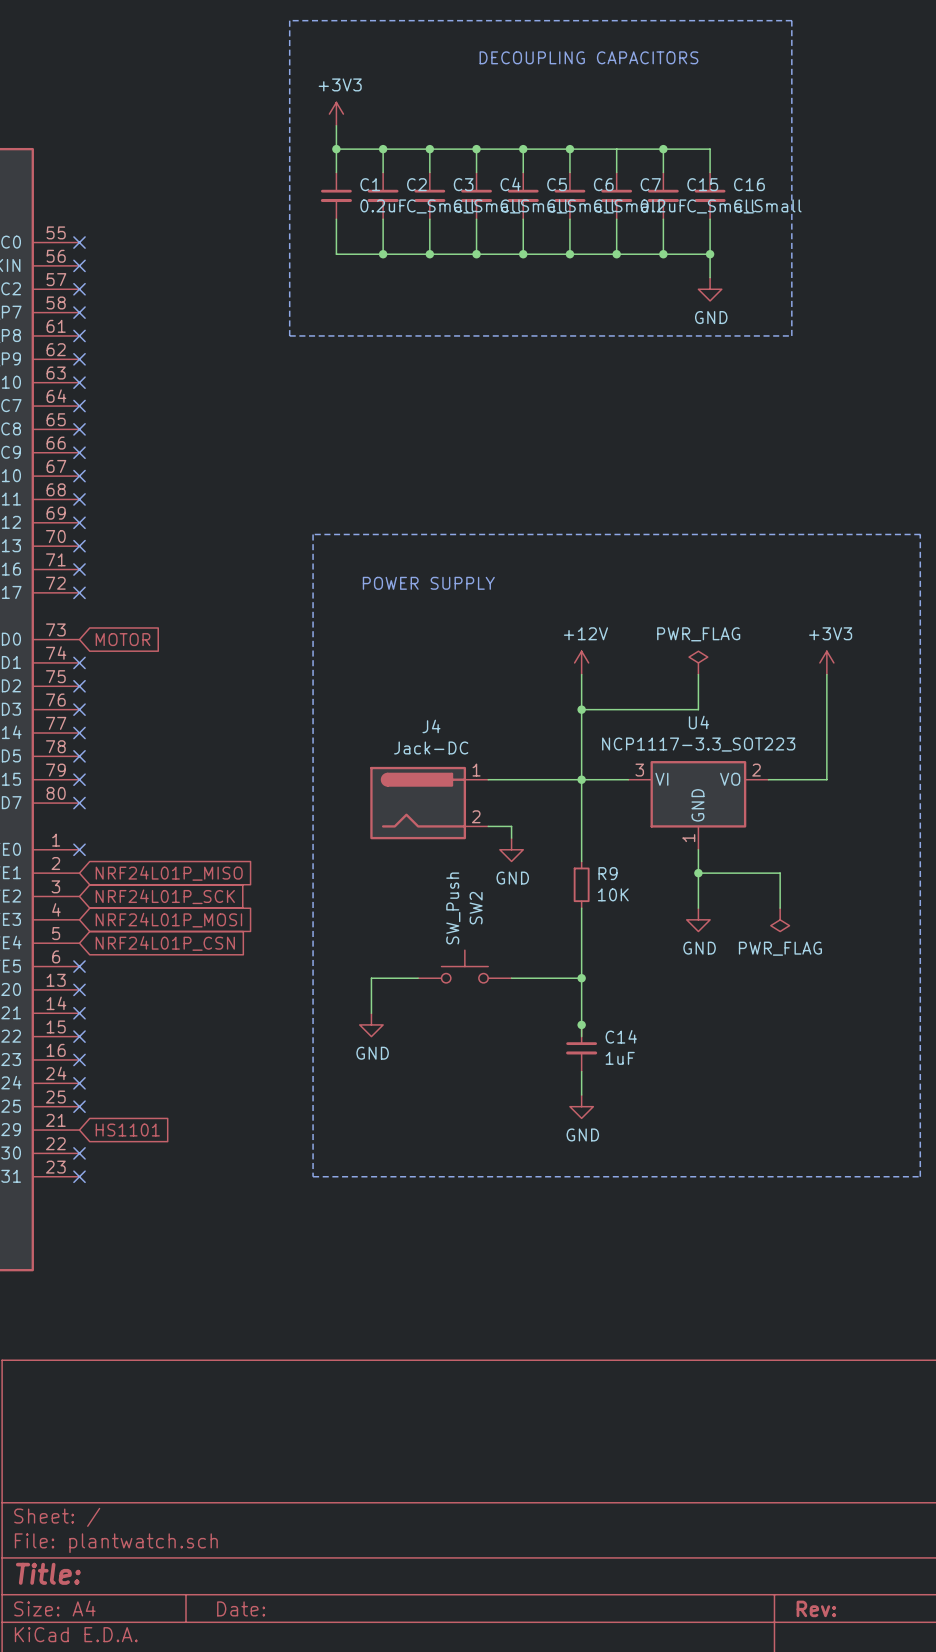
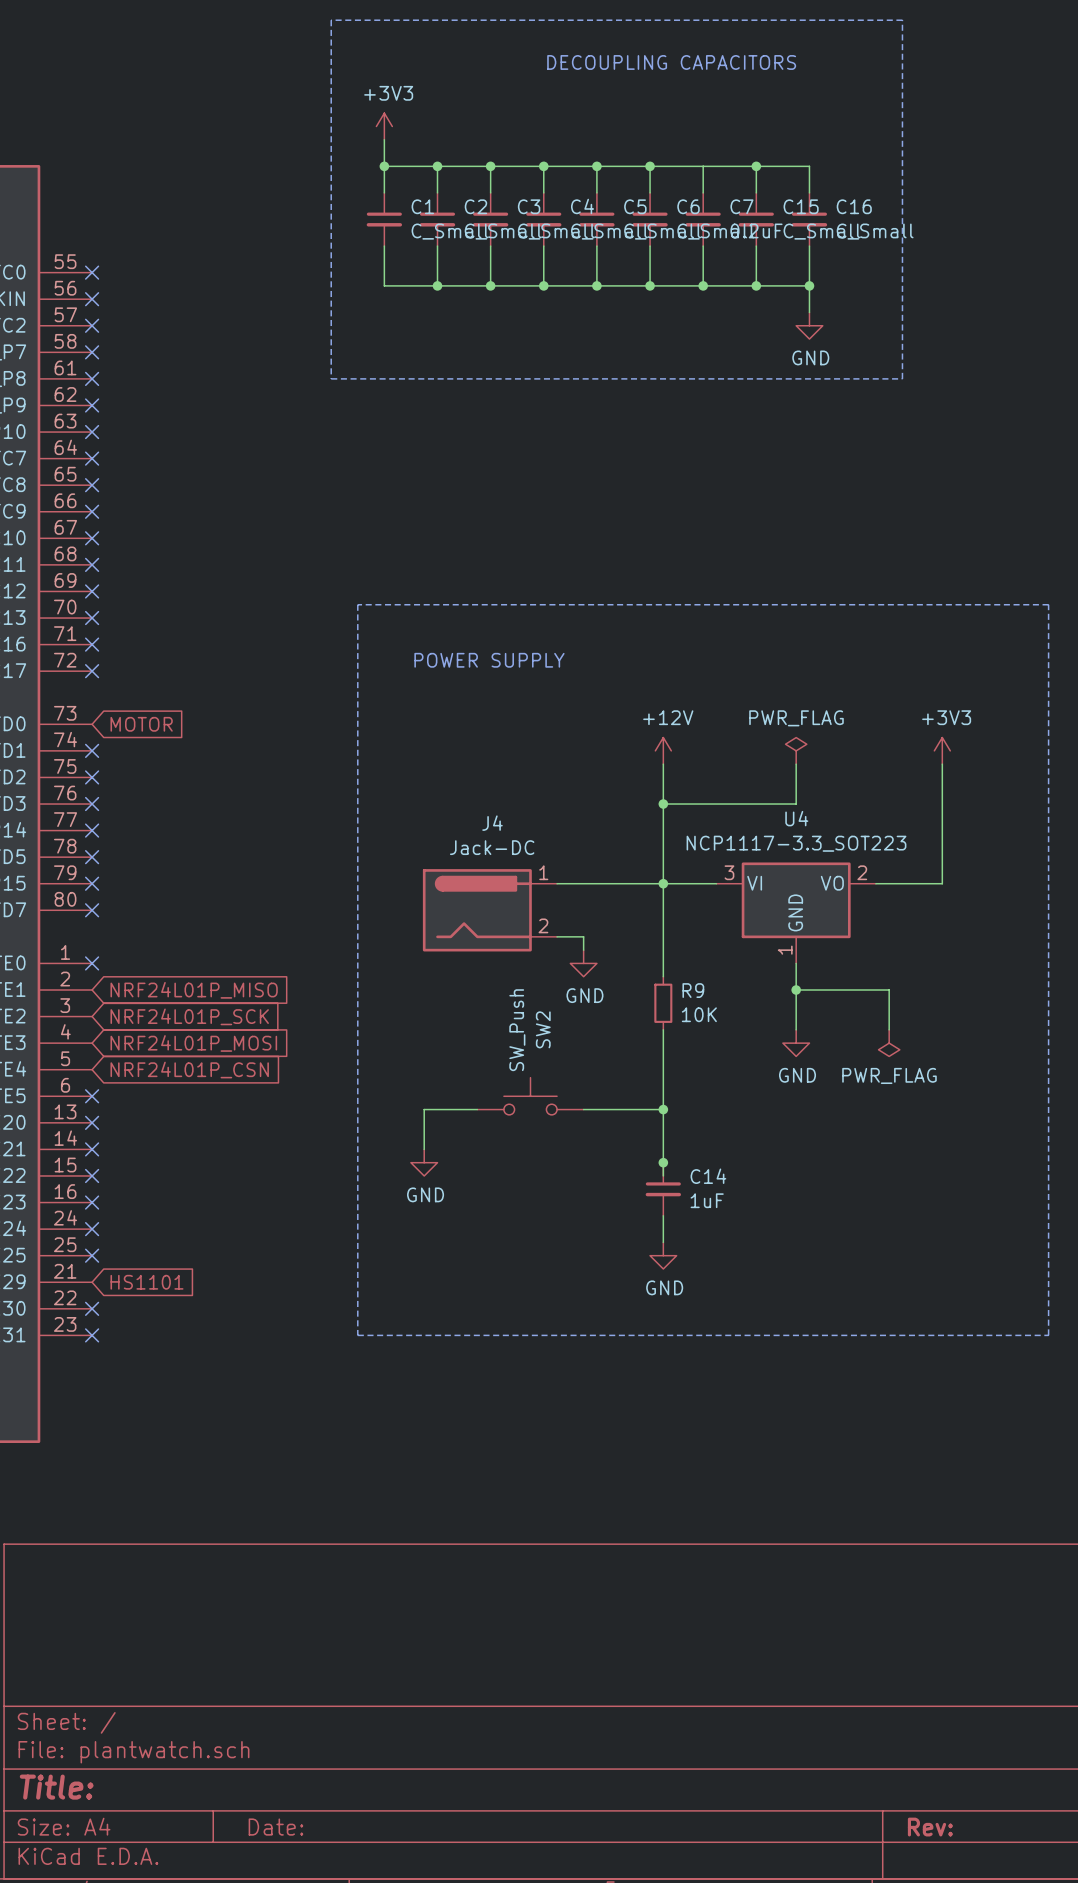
C1 value: 0.2uF (383, 205) -> C_Small (450, 231)

